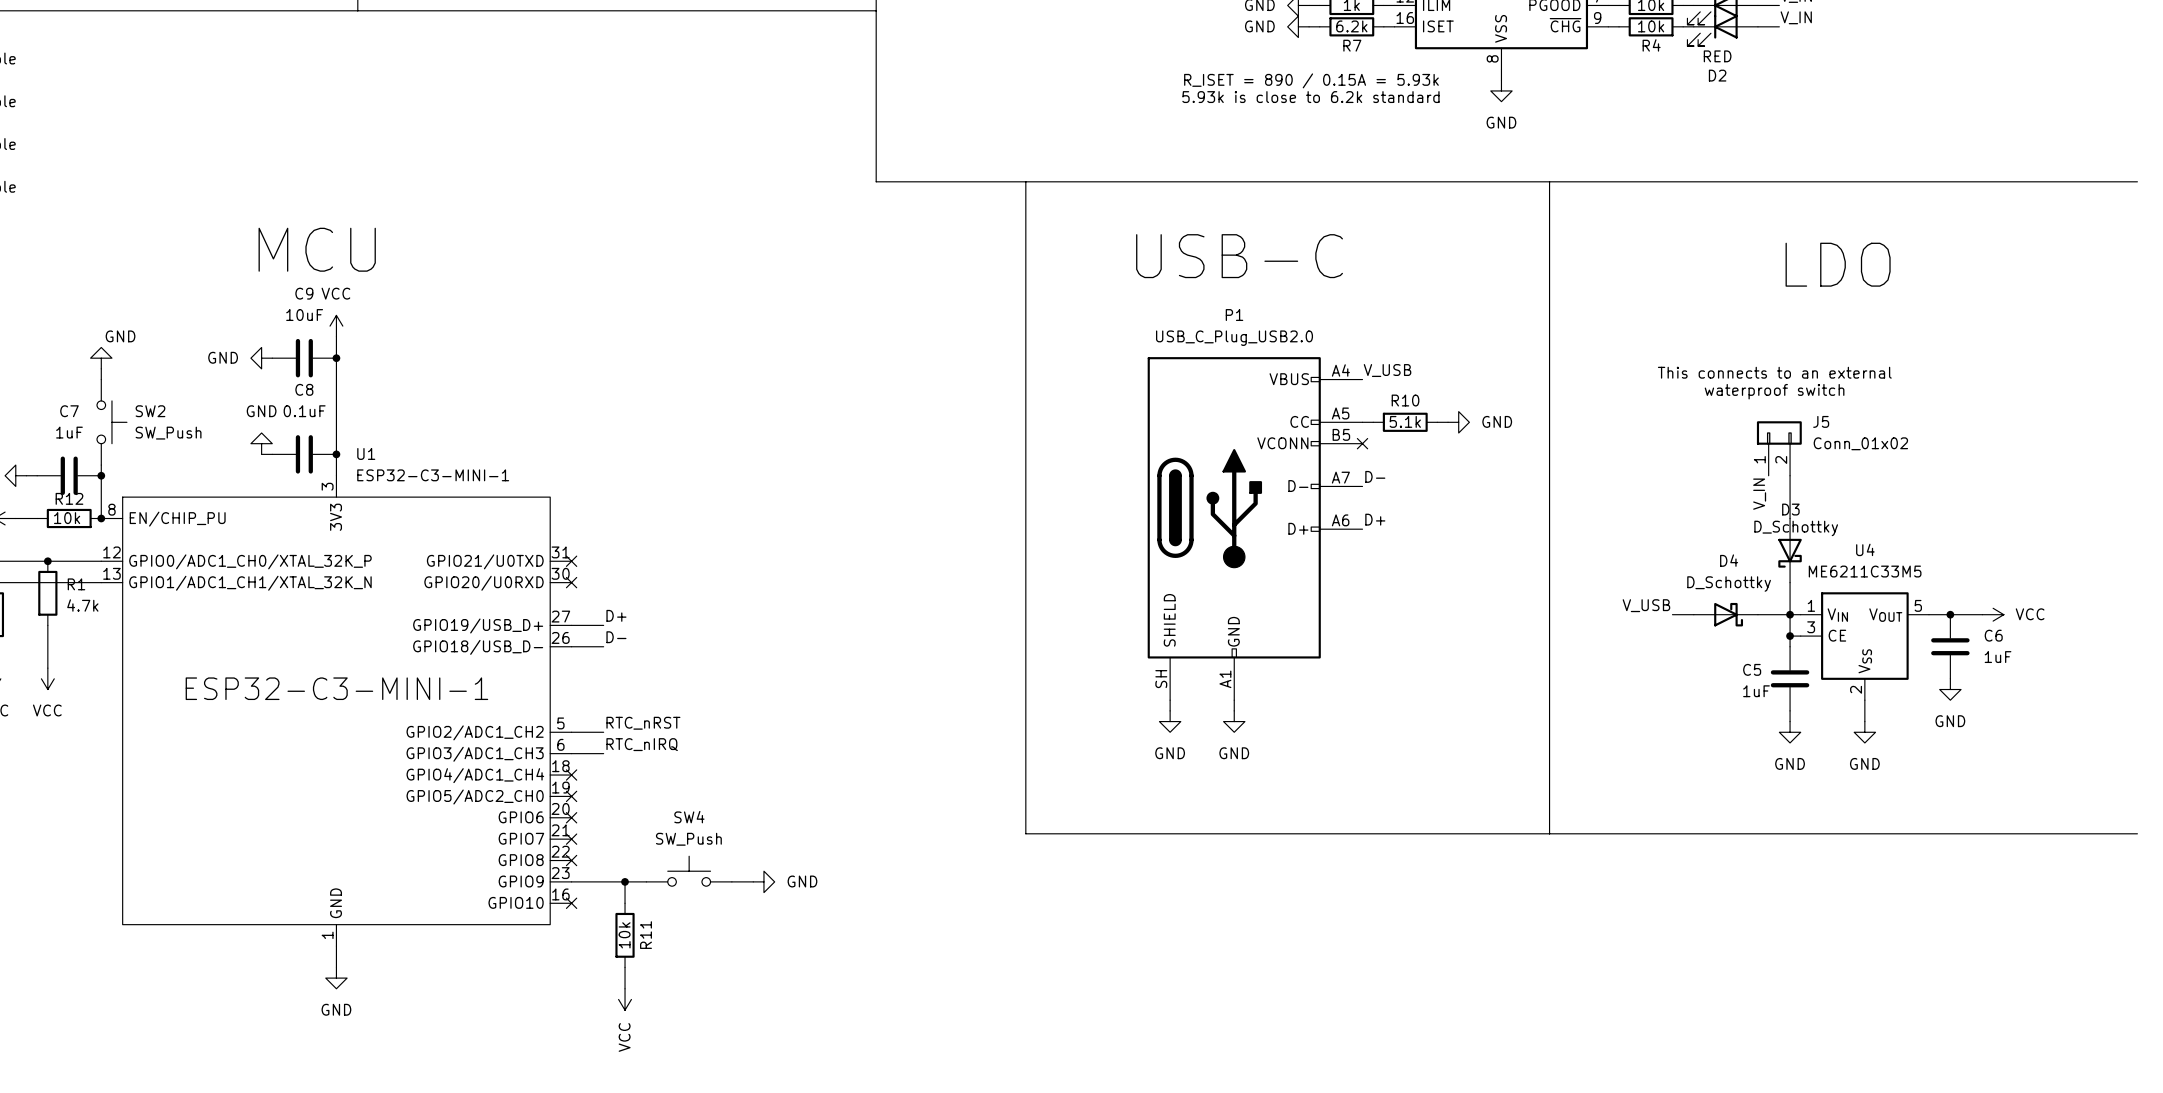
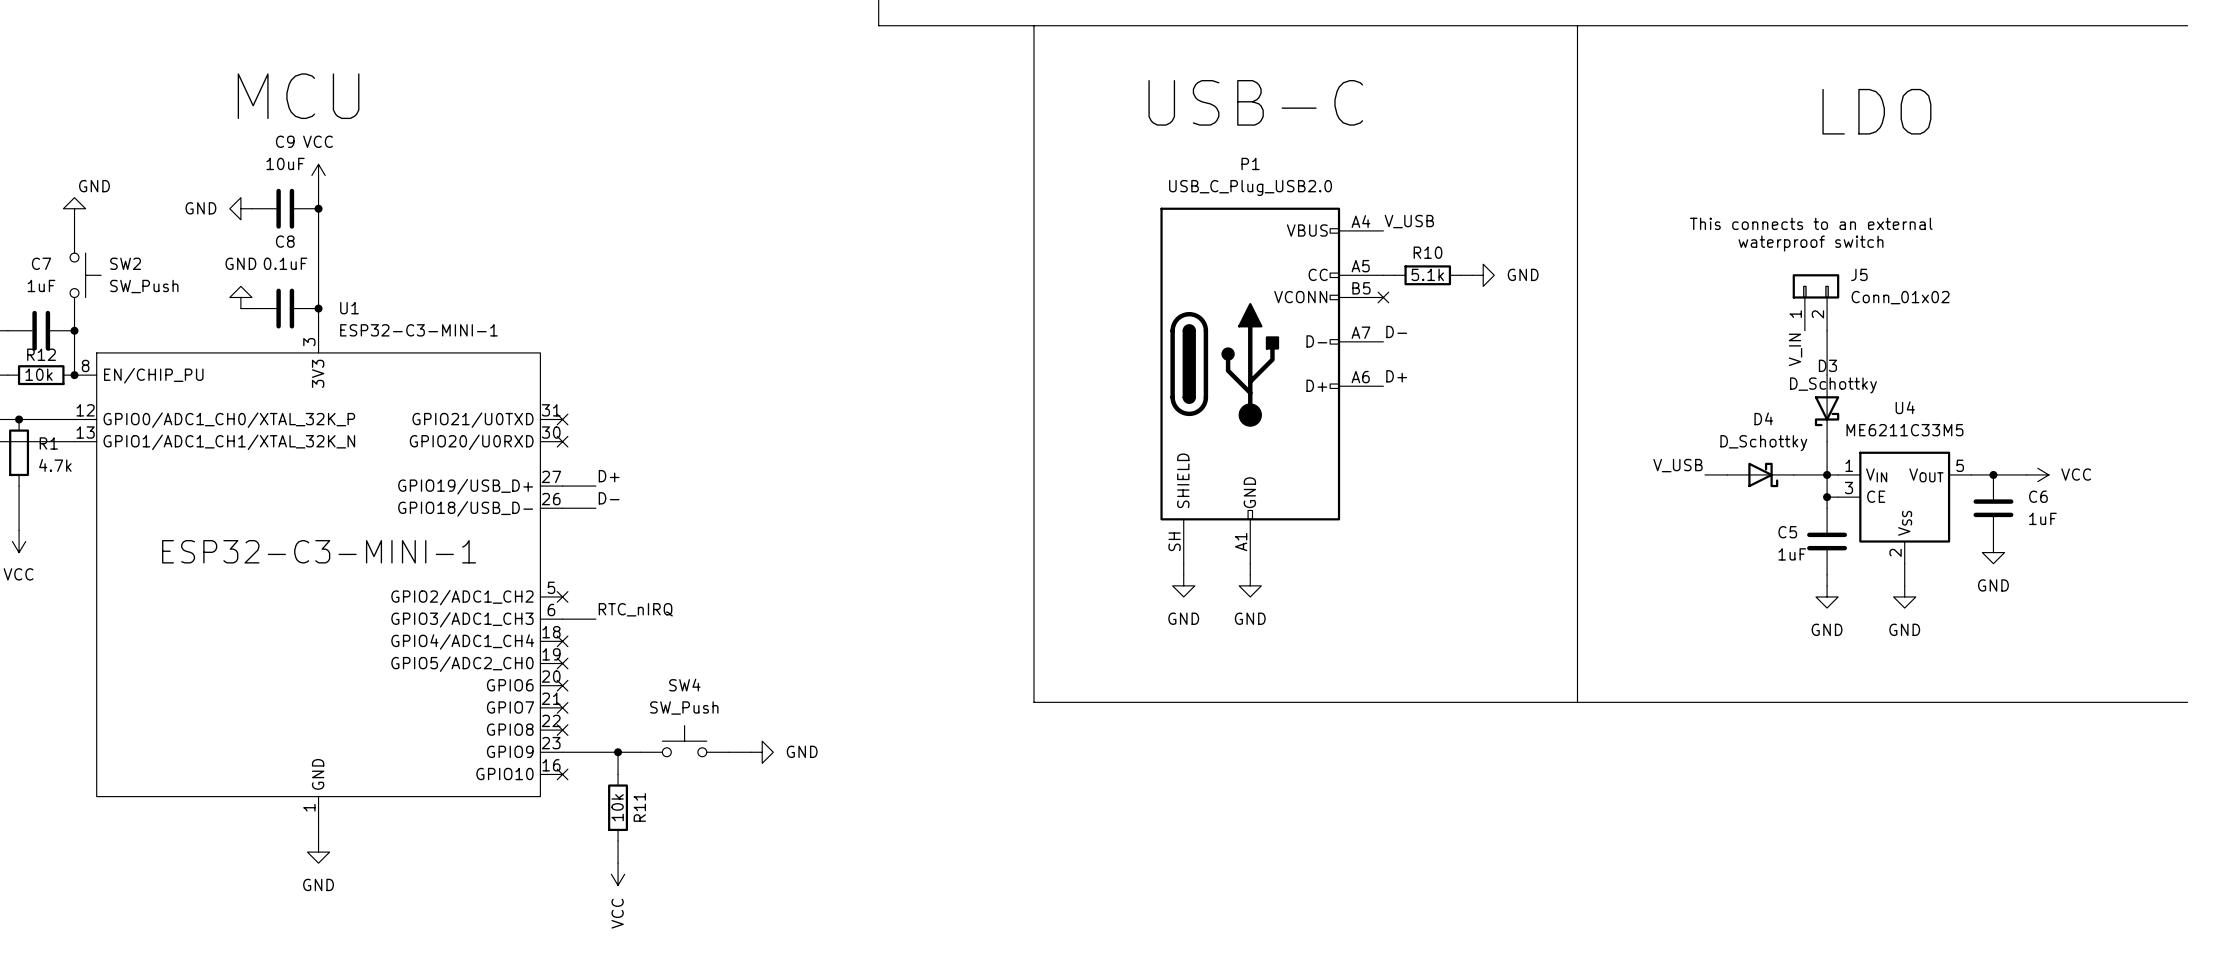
label: RTC_nRST (643, 723) -> none
wire: (571, 732) (603, 732) -> none
no-connect mark: none -> (562, 596)

